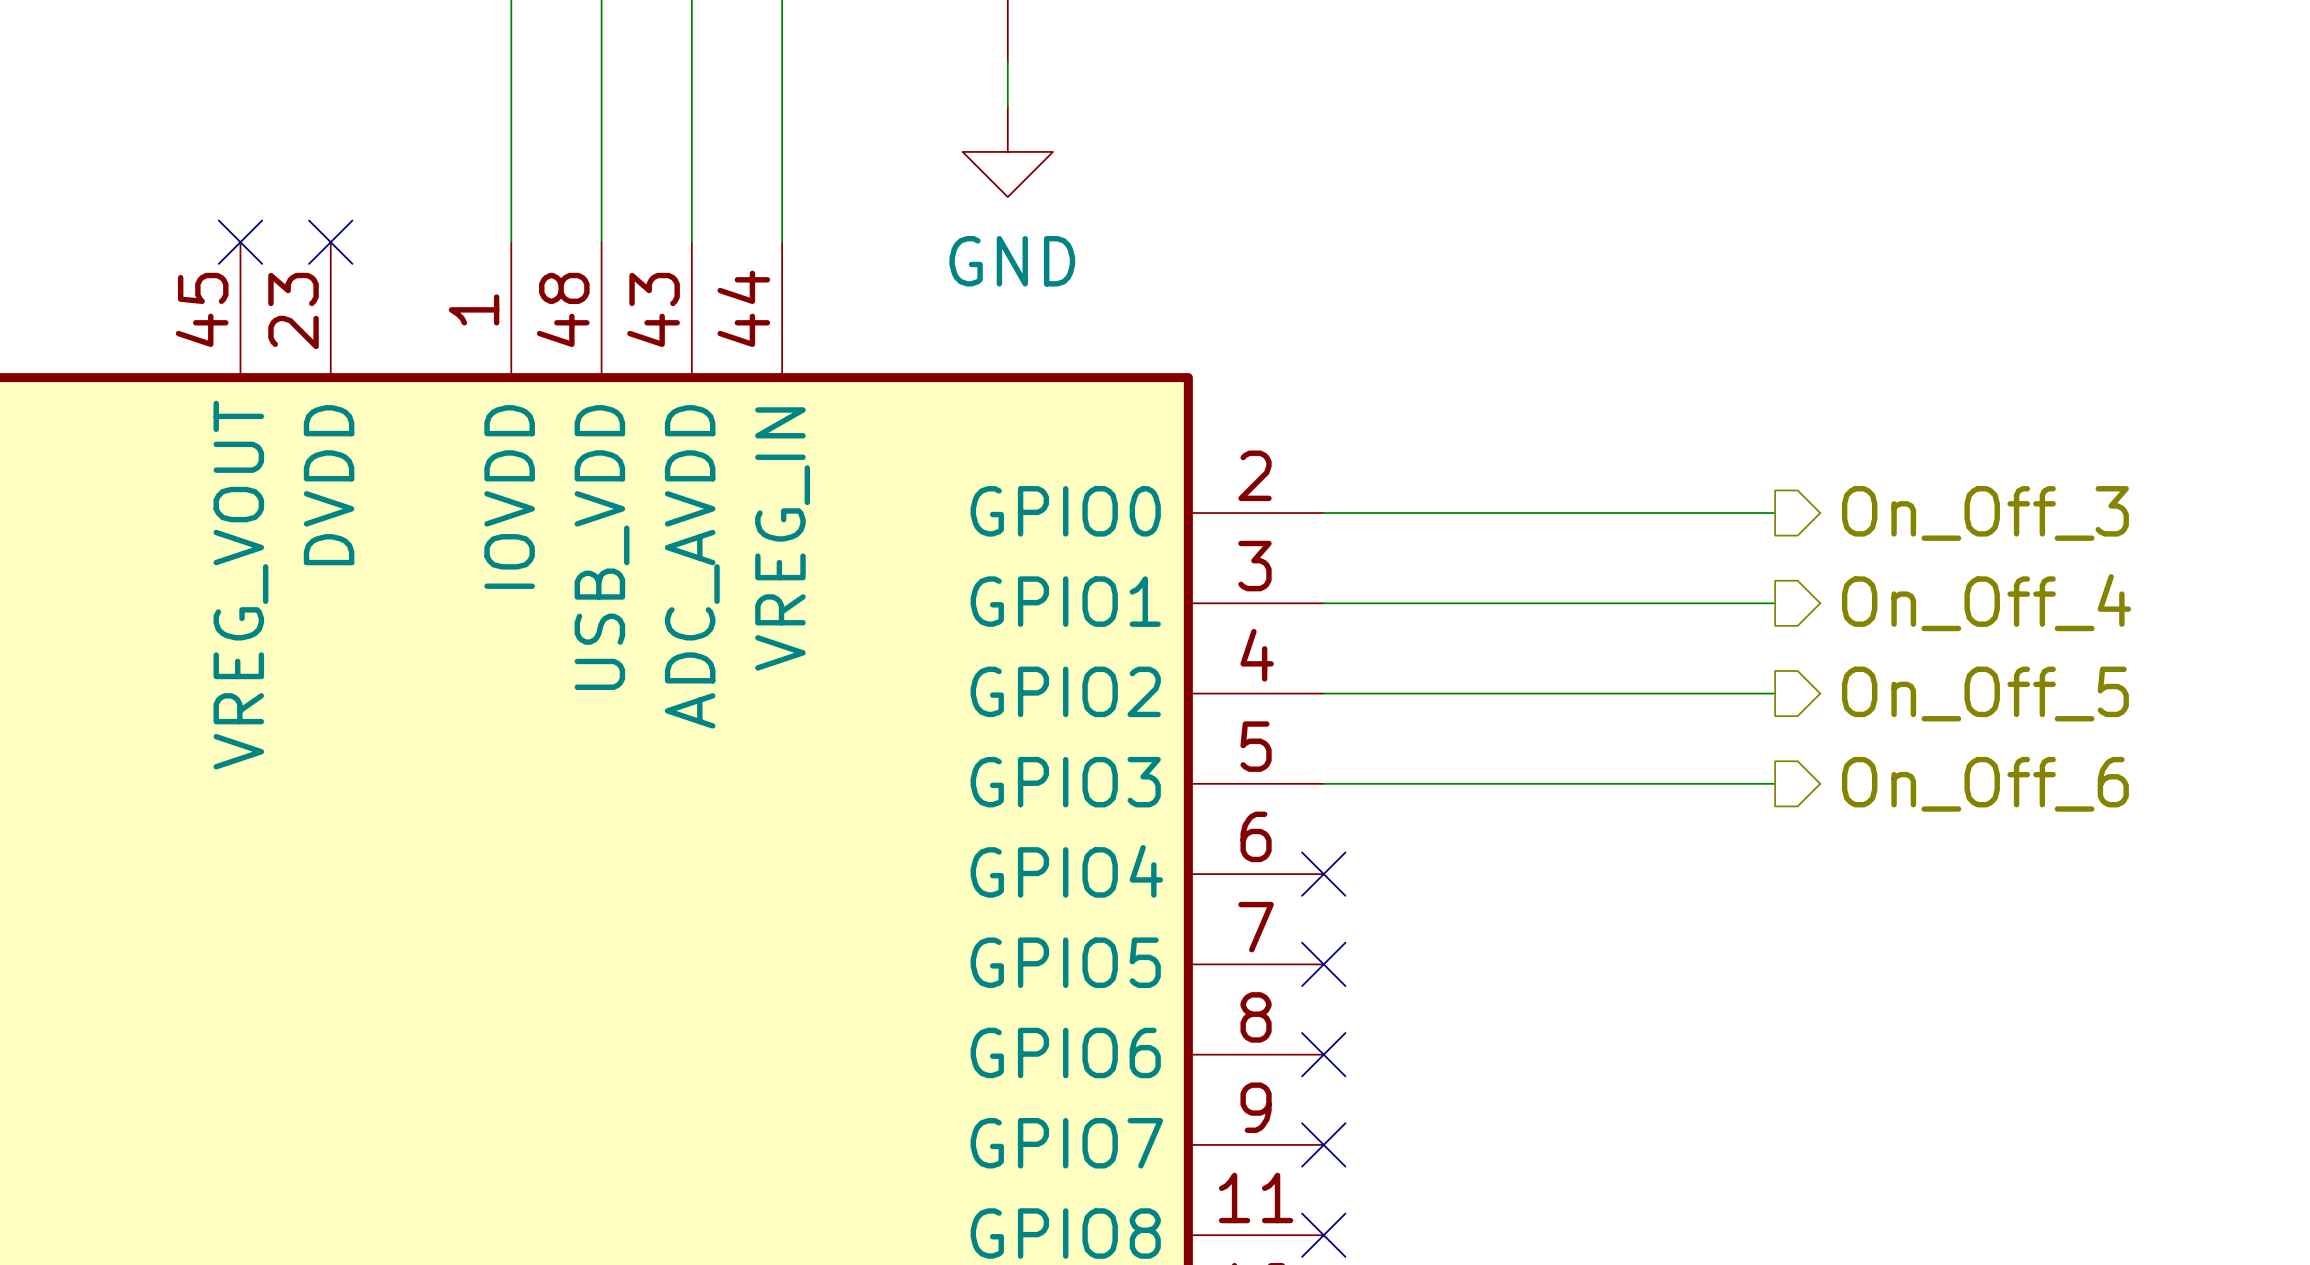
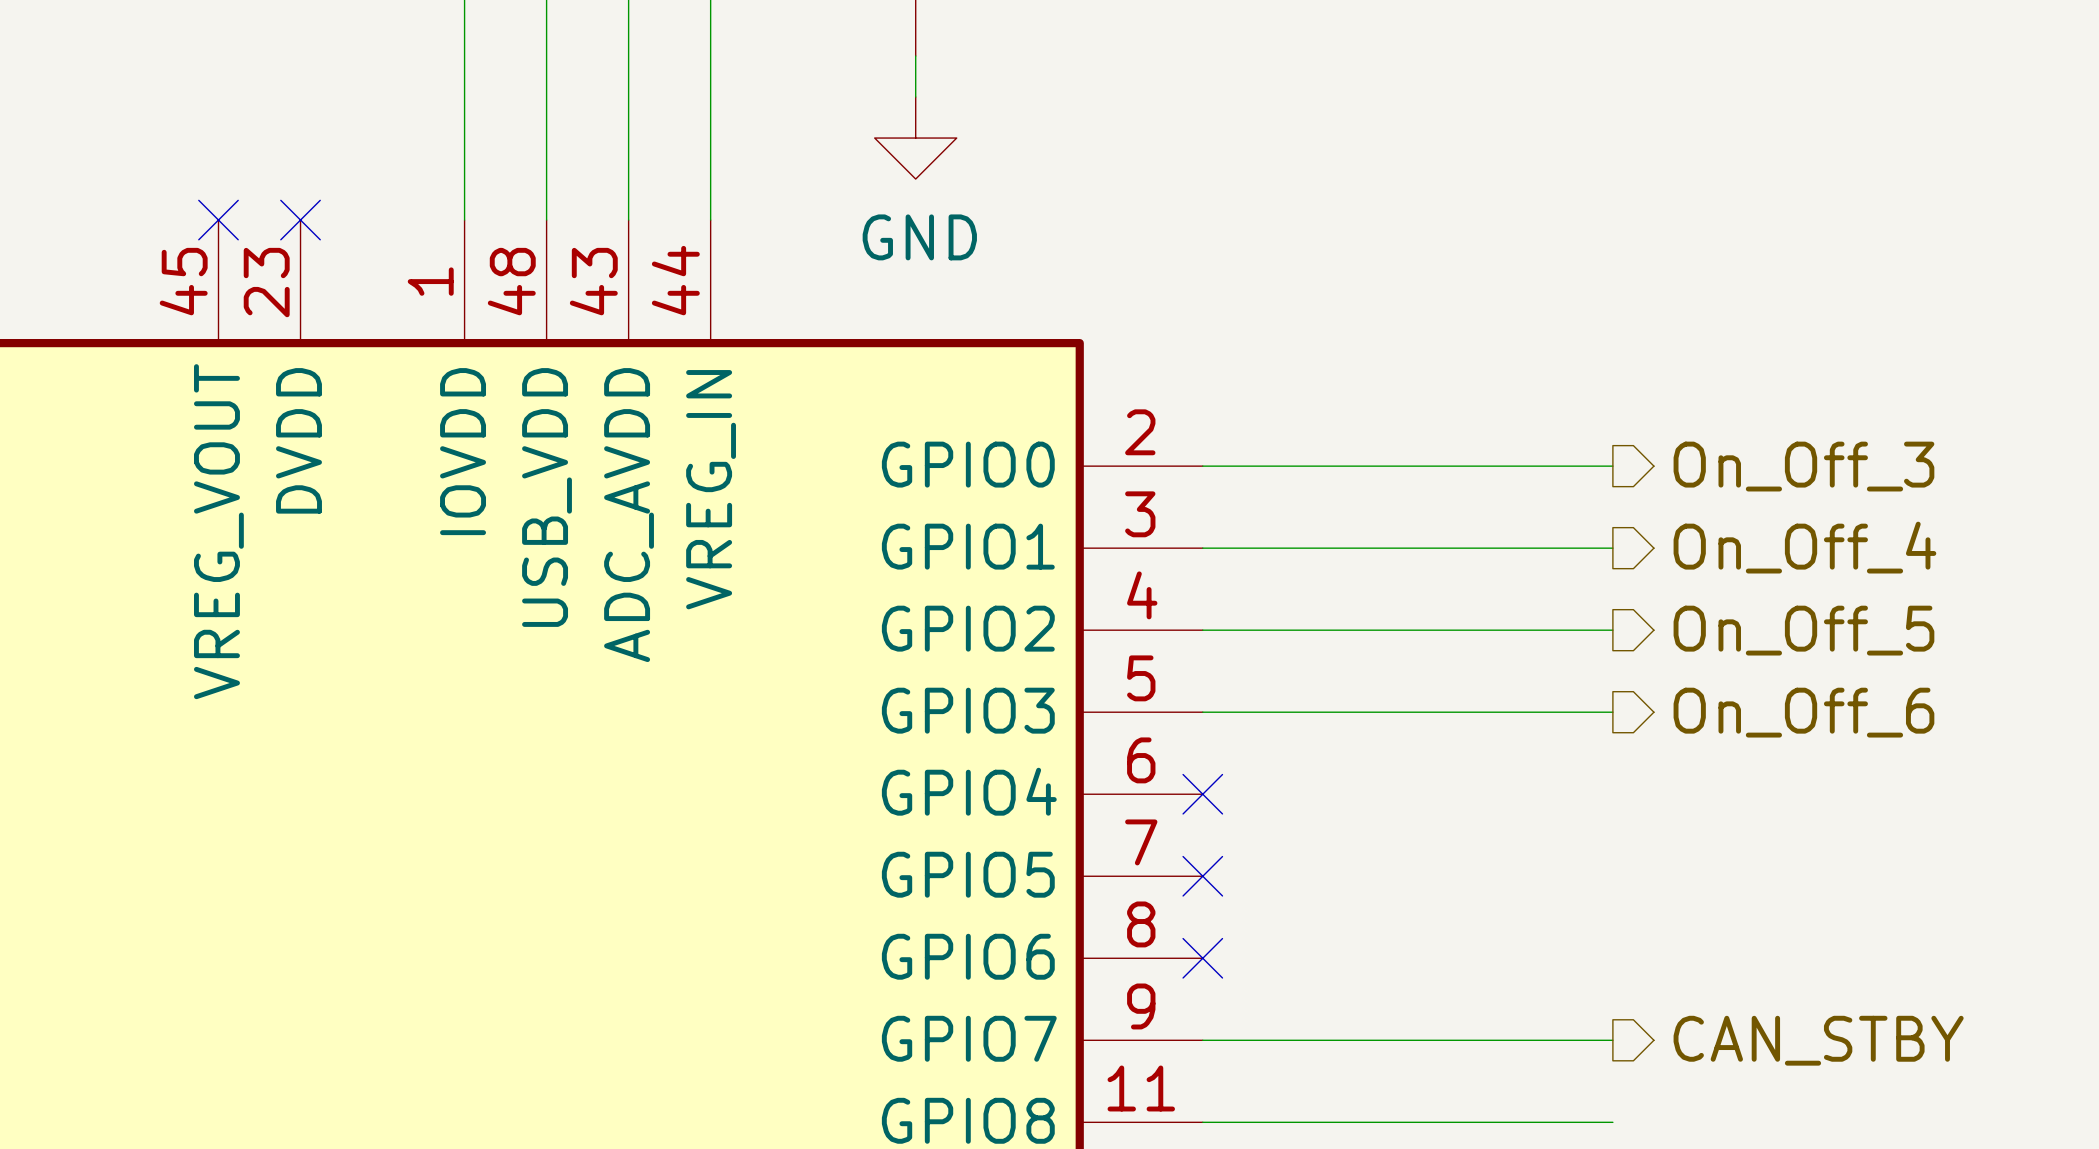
wire: none -> (1202, 1040) (1612, 1040)
no-connect mark: (1323, 1144) -> none
hierarchical label: none -> CAN_STBY (1818, 1040)
wire: none -> (1202, 1122) (1612, 1122)
no-connect mark: (1323, 1235) -> none

